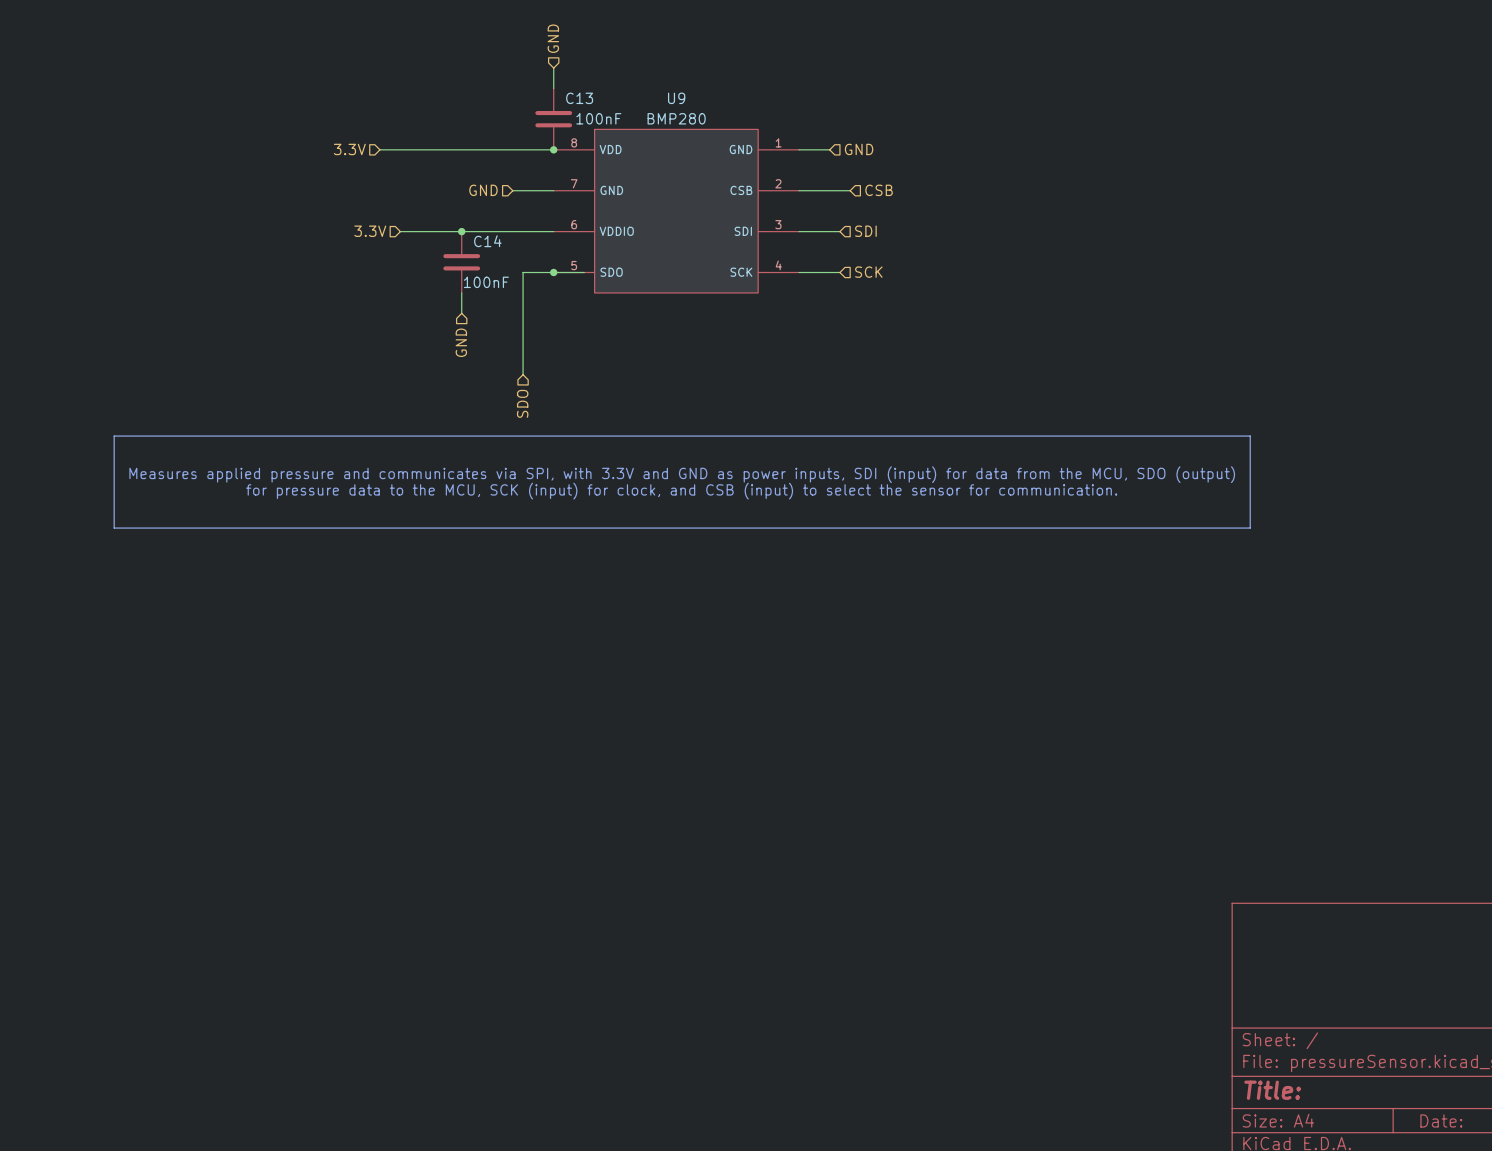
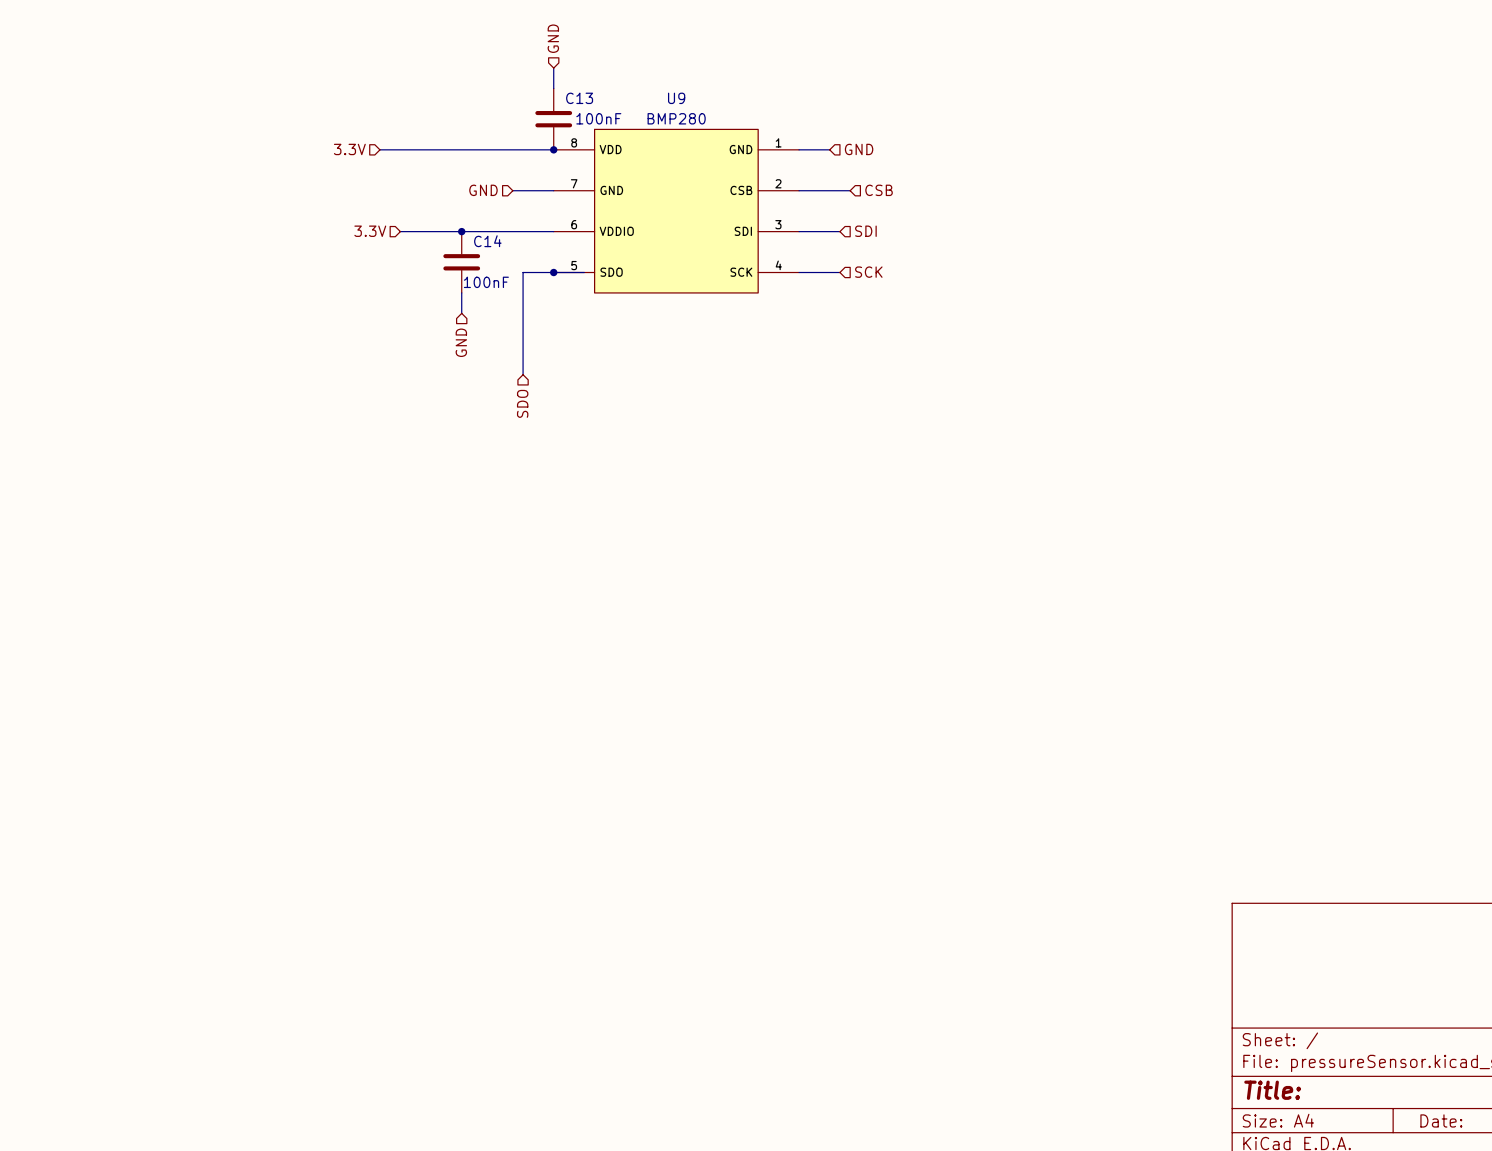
line: (114, 436) (1250, 436) (1250, 528) (114, 528) (114, 436) -> none
text: Measures applied pressure and communicates via SPI, with 3.3V and GND as power inputs, SDI (input) for data from the MCU, SDO (output) (682, 474) -> none
text: for pressure data to the MCU, SCK (input) for clock, and CSB (input) to select the sensor for communication. (681, 491) -> none

